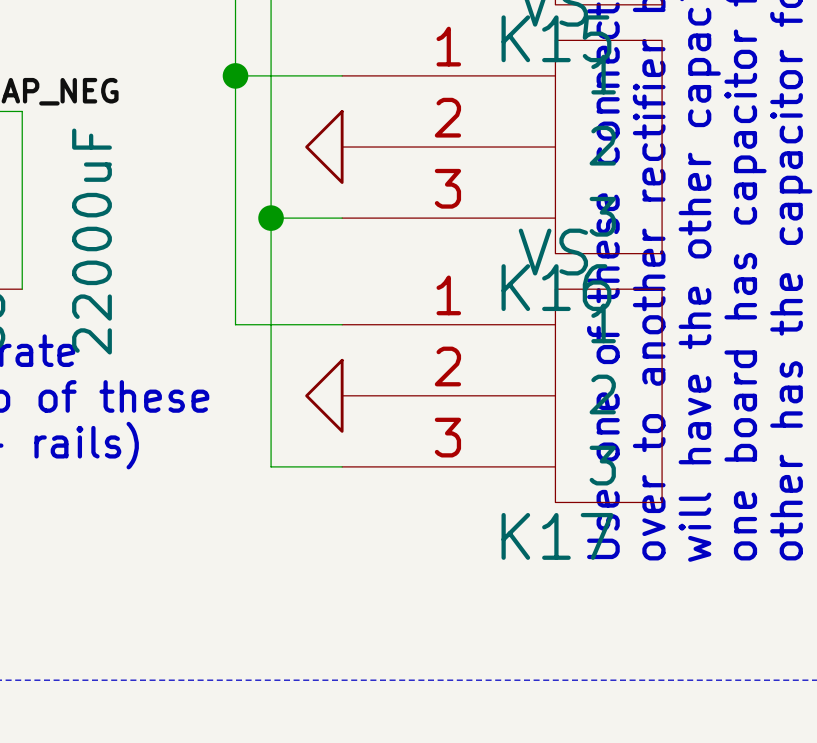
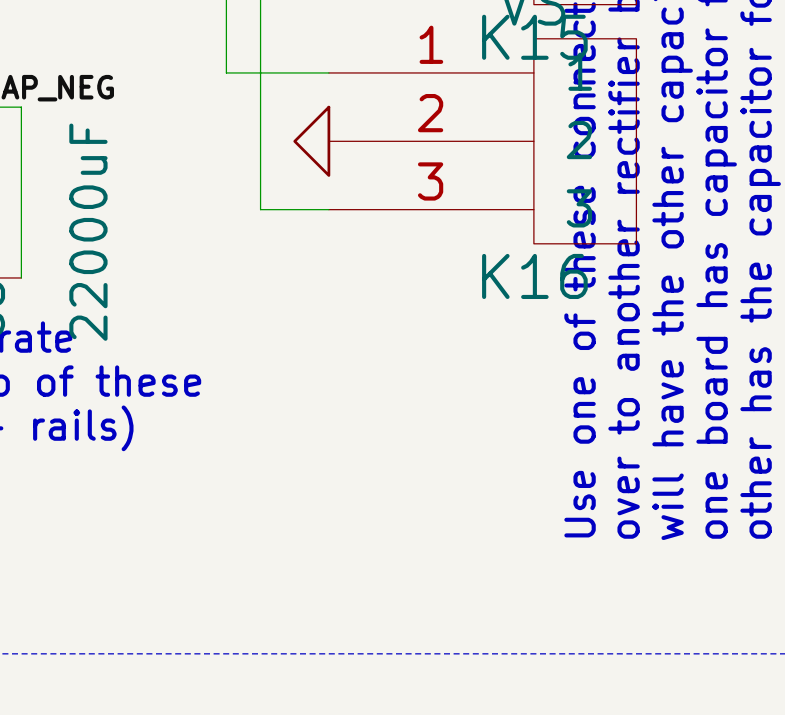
wire: (235, 75) (235, 324) (342, 324) -> none
junction: (235, 75) -> none
wire: (271, 218) (271, 466) (342, 466) -> none
junction: (271, 218) -> none
power symbol: (324, 395) -> none
K17: VS (502, 395) -> none

